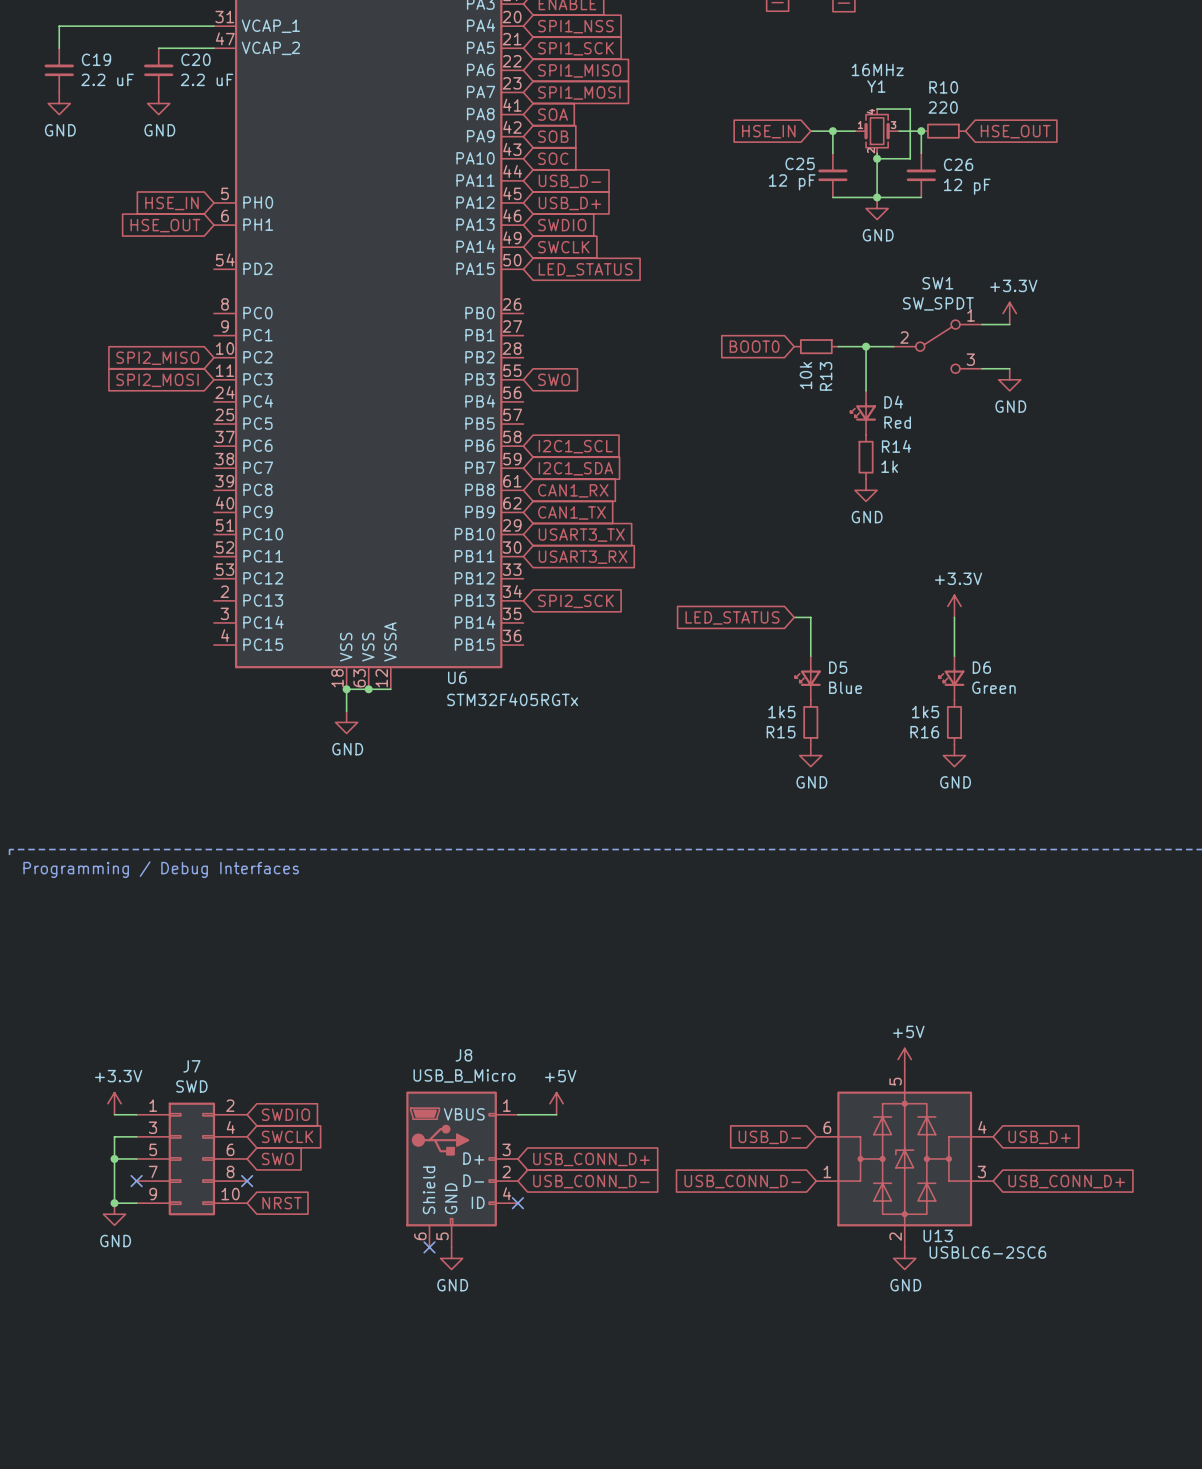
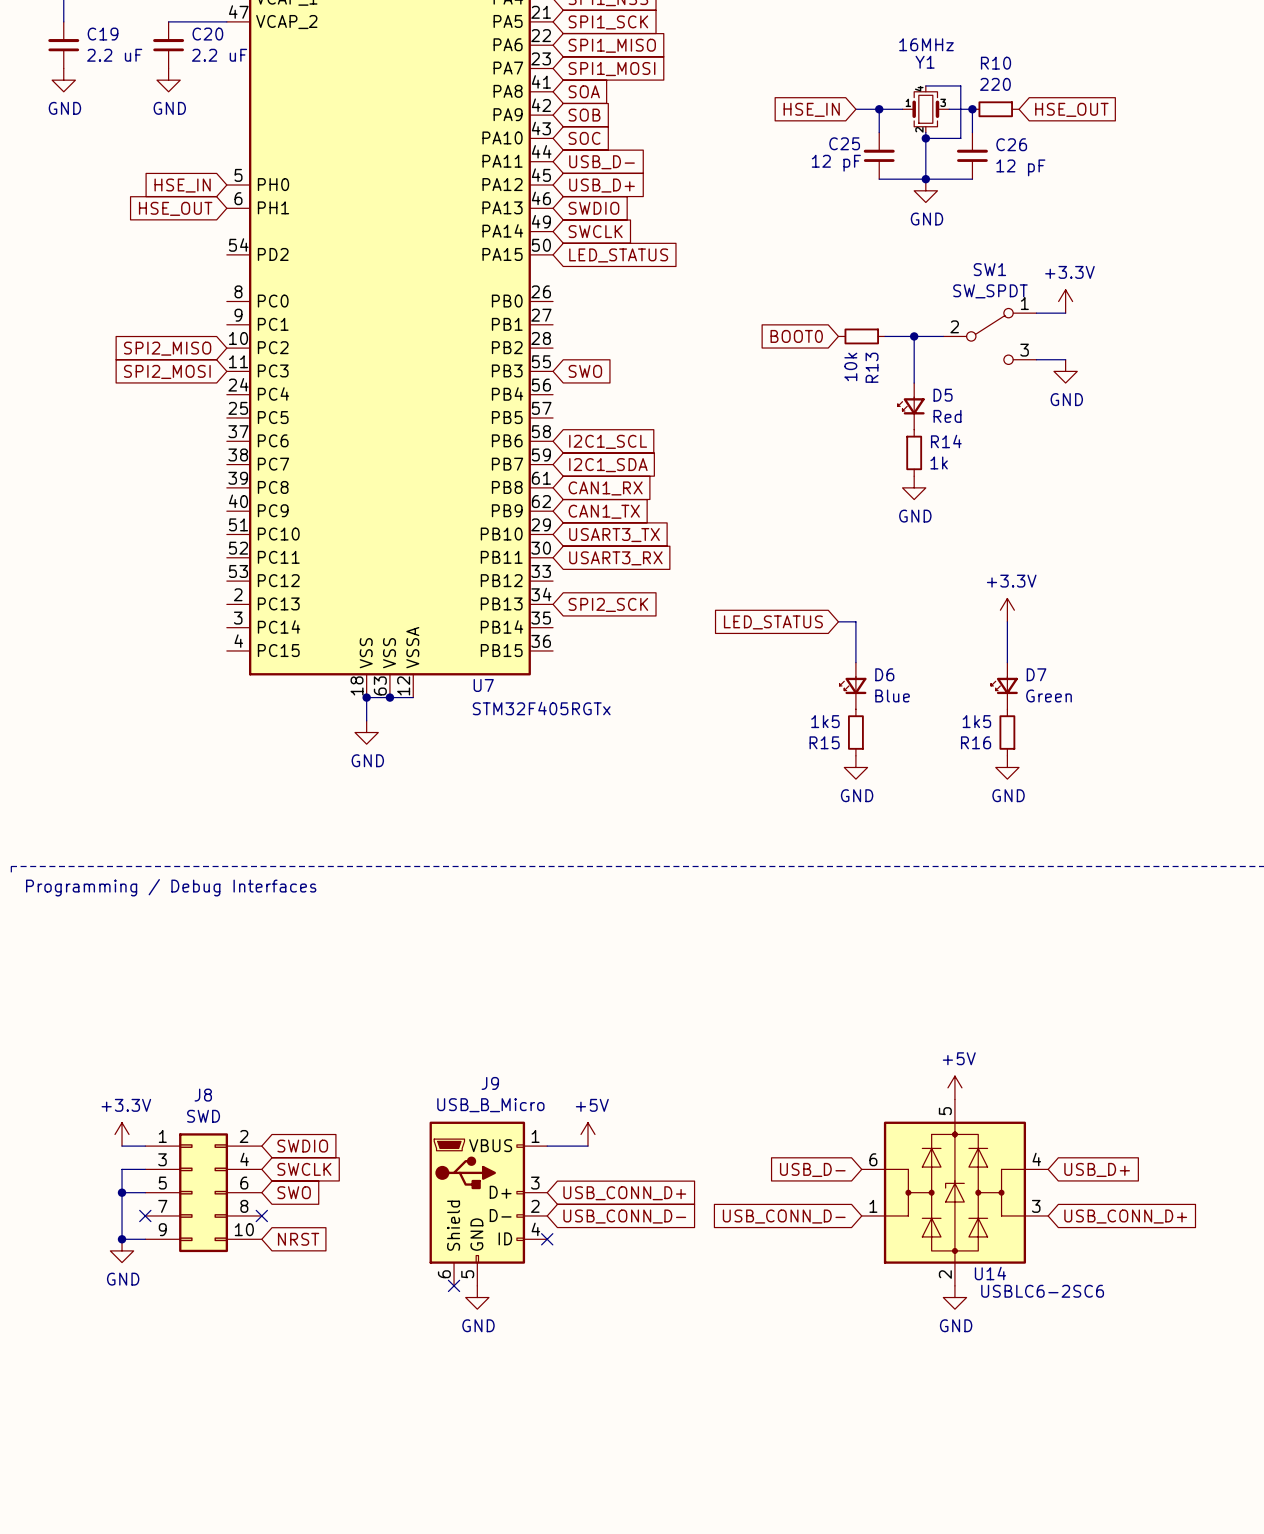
D4 name: D4 (893, 402) -> D5 (943, 395)
D5 name: D5 (838, 667) -> D6 (884, 674)
D6 name: D6 (981, 667) -> D7 (1036, 674)
U6 name: U6 (457, 677) -> U7 (483, 685)
J8 name: J8 (463, 1055) -> J9 (490, 1083)
J7 name: J7 (191, 1066) -> J8 (203, 1095)
U13 name: U13 (938, 1235) -> U14 (990, 1273)

